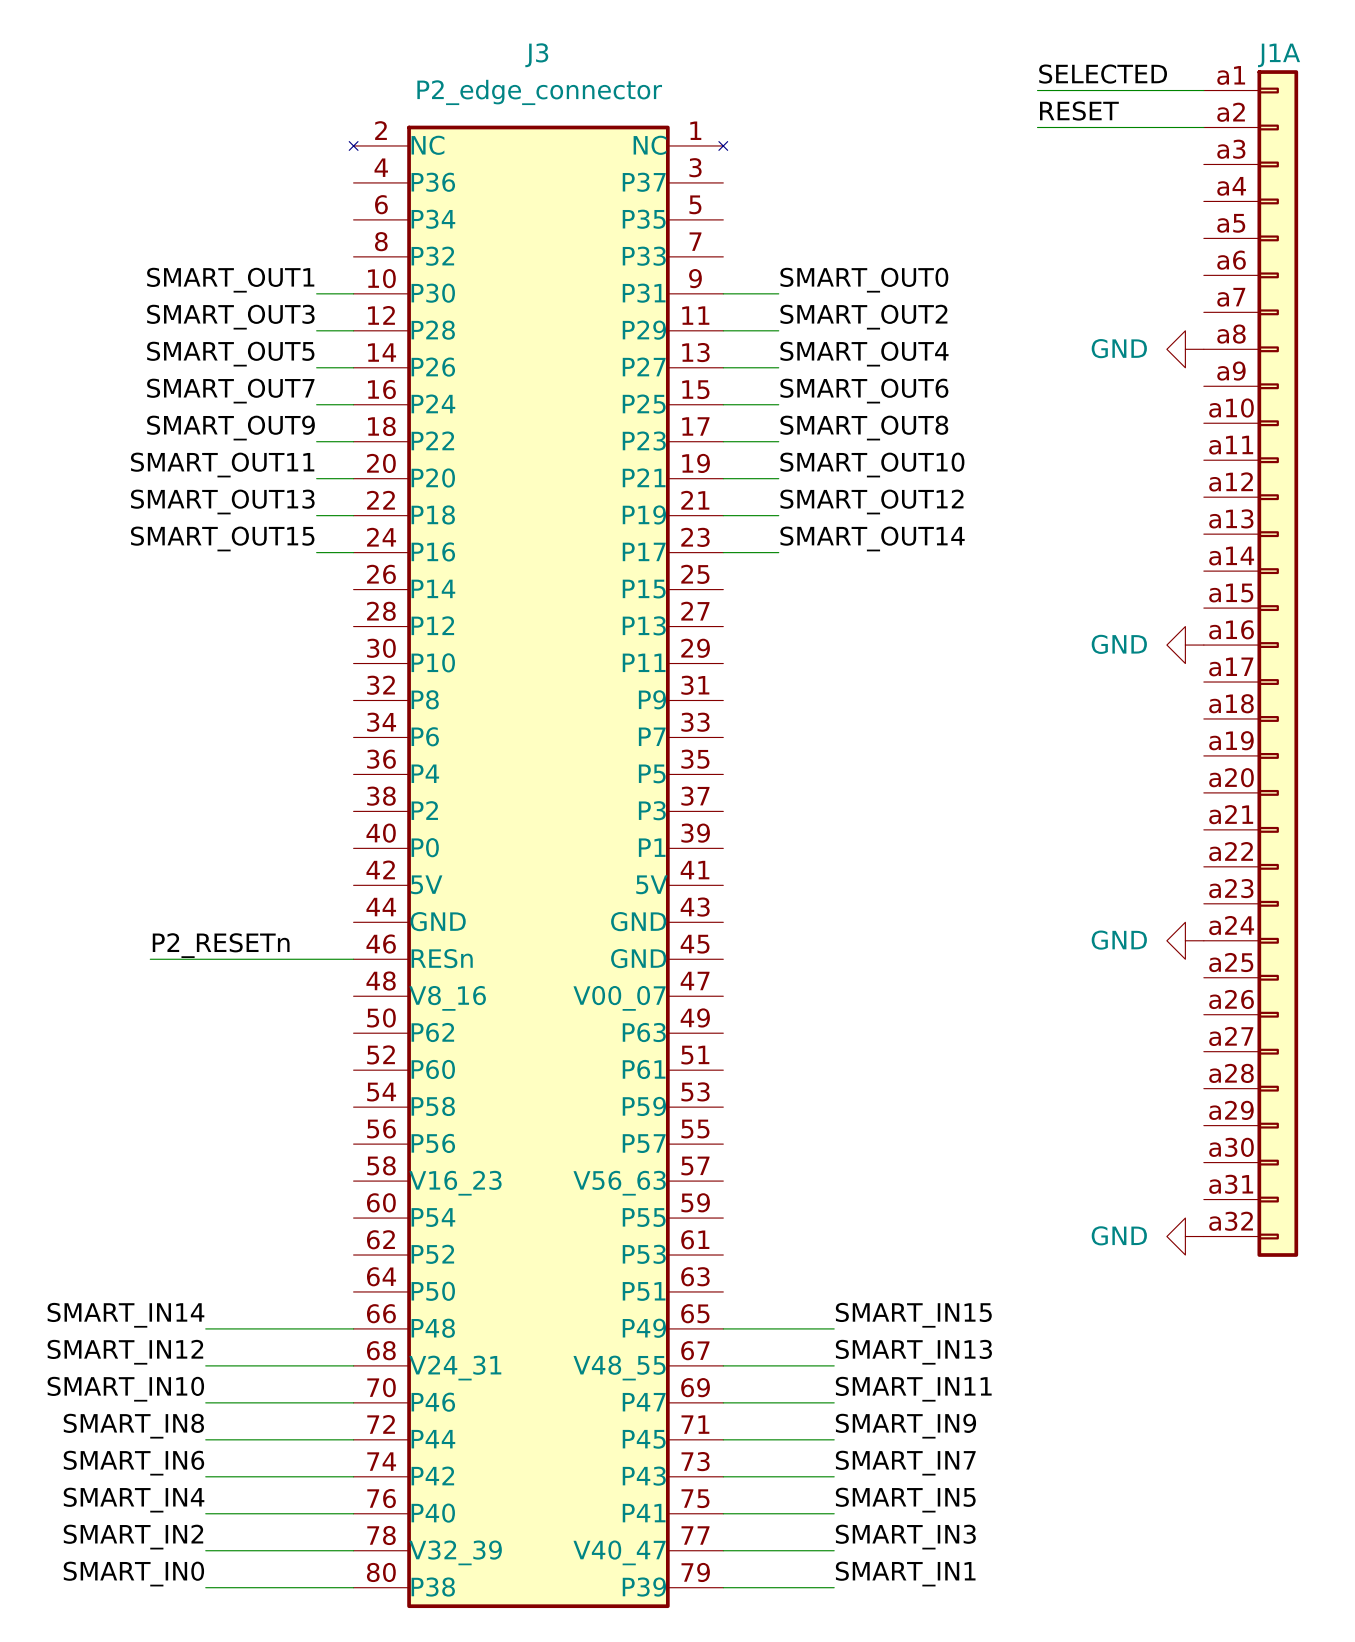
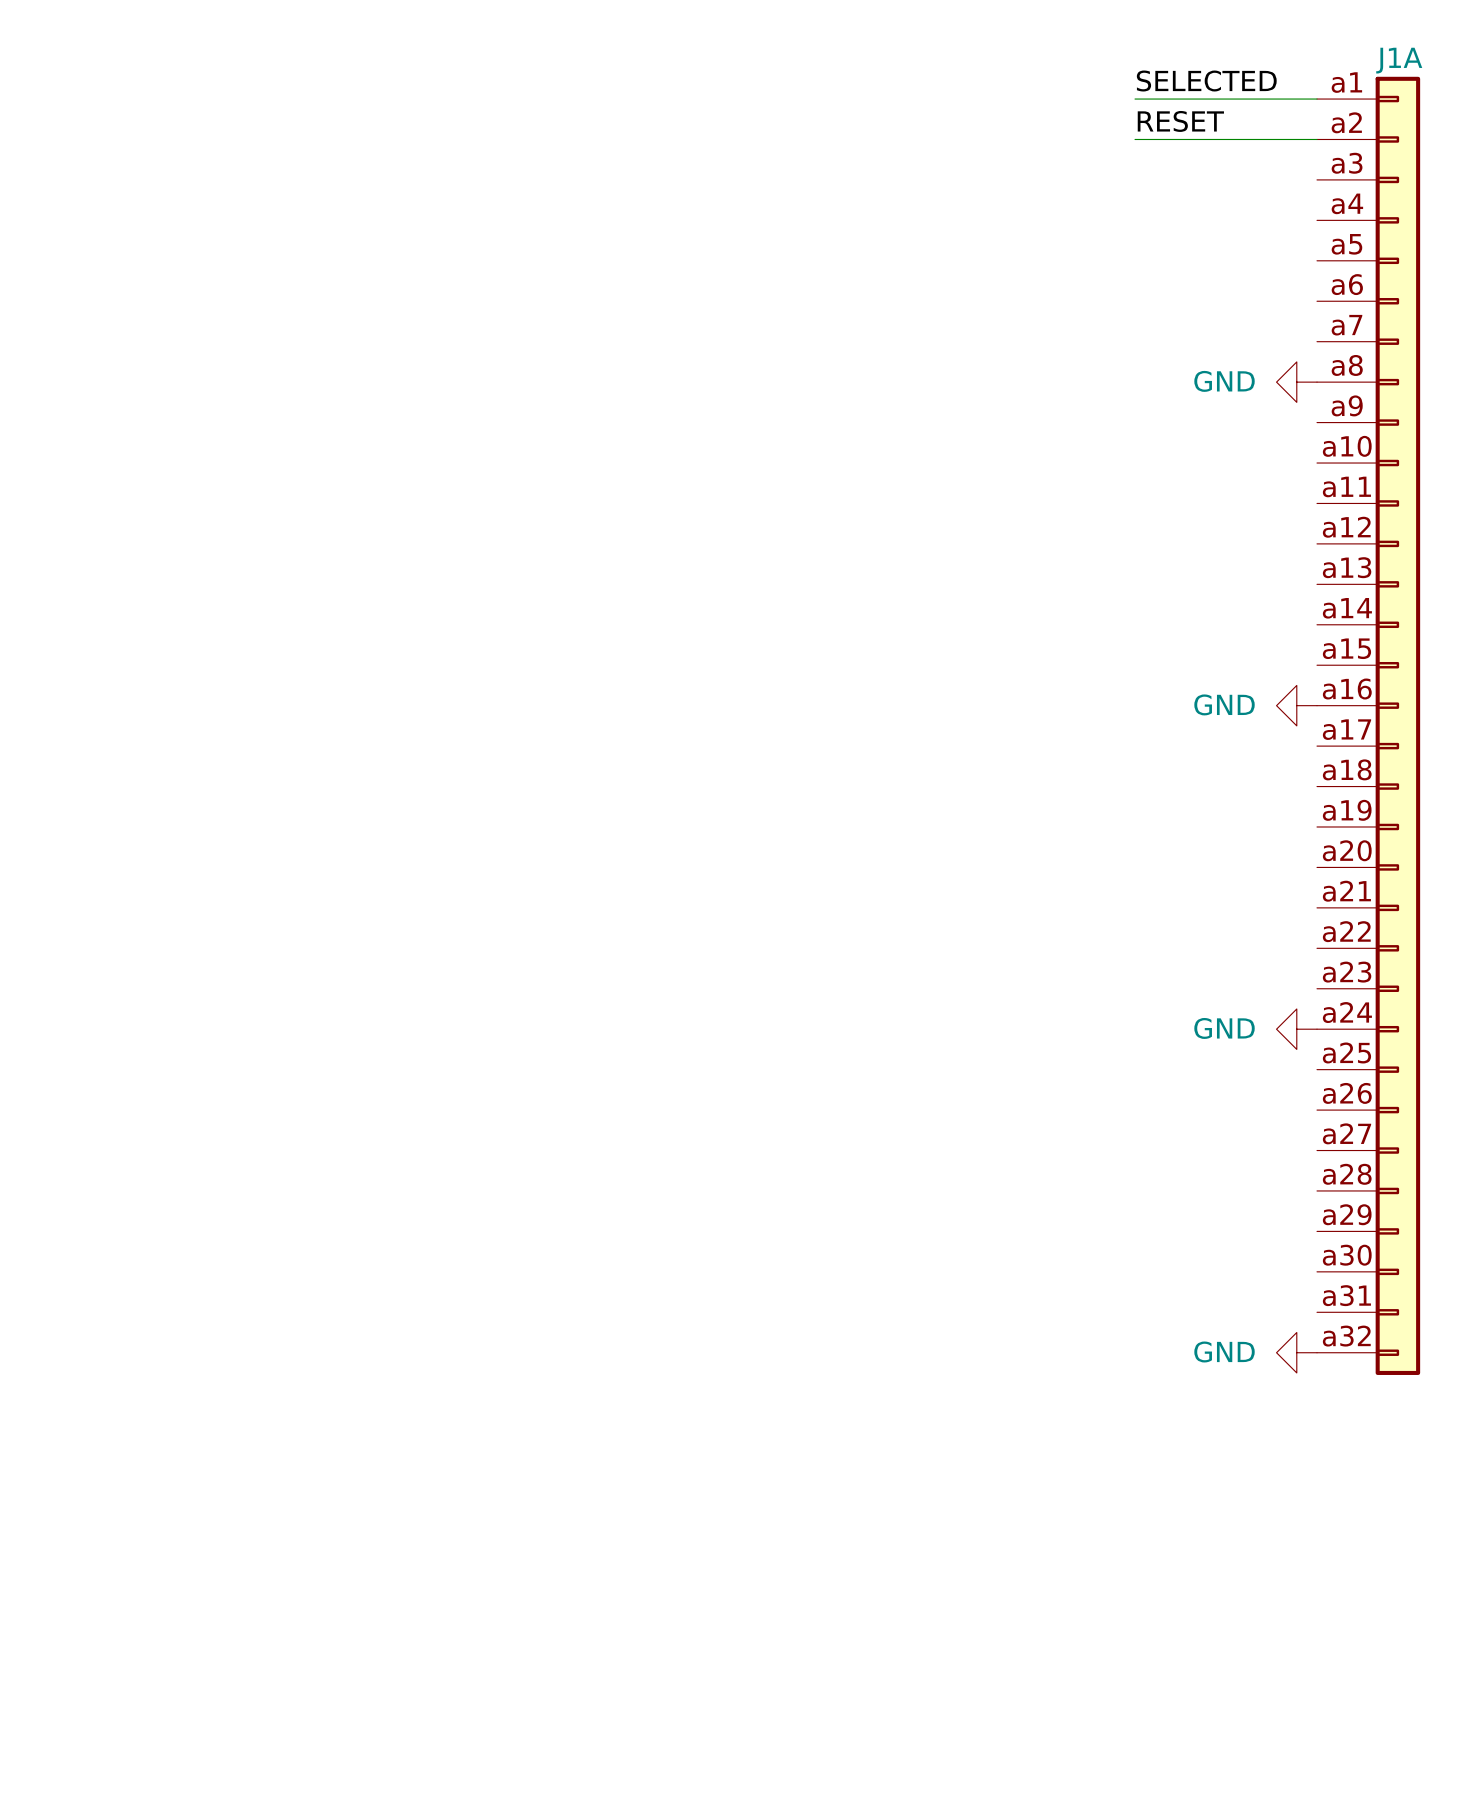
label: SMART_OUT1 (230, 280) -> none
label: SMART_OUT0 (864, 280) -> none
wire: (316, 293) (353, 293) -> none
wire: (723, 293) (778, 293) -> none
label: SMART_OUT3 (230, 317) -> none
label: SMART_OUT2 (863, 317) -> none
wire: (316, 330) (353, 330) -> none
wire: (723, 330) (778, 330) -> none
label: SMART_OUT5 (230, 354) -> none
label: SMART_OUT4 (864, 354) -> none
wire: (316, 367) (353, 367) -> none
wire: (723, 367) (778, 367) -> none
label: SMART_OUT7 (230, 391) -> none
label: SMART_OUT6 (864, 391) -> none
wire: (316, 404) (353, 404) -> none
wire: (723, 404) (778, 404) -> none
label: SMART_OUT9 (230, 428) -> none
label: SMART_OUT8 (864, 428) -> none
wire: (316, 441) (353, 441) -> none
wire: (723, 441) (778, 441) -> none
label: SMART_OUT11 (222, 465) -> none
label: SMART_OUT10 (872, 465) -> none
wire: (316, 478) (353, 478) -> none
wire: (723, 478) (778, 478) -> none
label: SMART_OUT13 (222, 501) -> none
label: SMART_OUT12 (871, 501) -> none
wire: (316, 515) (353, 515) -> none
wire: (723, 515) (778, 515) -> none
label: SMART_OUT15 (222, 538) -> none
label: SMART_OUT14 (872, 538) -> none
wire: (316, 552) (353, 552) -> none
wire: (723, 552) (778, 552) -> none
J3: P2_edge_connector (538, 866) -> none
label: P2_RESETn (221, 945) -> none
wire: (150, 959) (353, 959) -> none
label: SMART_IN14 (125, 1315) -> none
label: SMART_IN15 (913, 1315) -> none
wire: (205, 1328) (353, 1328) -> none
wire: (723, 1328) (834, 1328) -> none
label: SMART_IN12 (125, 1352) -> none
label: SMART_IN13 (913, 1352) -> none
wire: (205, 1365) (353, 1365) -> none
wire: (723, 1365) (834, 1365) -> none
label: SMART_IN10 (125, 1389) -> none
label: SMART_IN11 (913, 1389) -> none
wire: (205, 1402) (353, 1402) -> none
wire: (723, 1402) (834, 1402) -> none
label: SMART_IN8 (133, 1426) -> none
label: SMART_IN9 (905, 1426) -> none
wire: (205, 1439) (353, 1439) -> none
wire: (723, 1439) (834, 1439) -> none
label: SMART_IN6 (133, 1463) -> none
label: SMART_IN7 (905, 1463) -> none
wire: (205, 1476) (353, 1476) -> none
wire: (723, 1476) (834, 1476) -> none
label: SMART_IN4 (134, 1500) -> none
label: SMART_IN5 (905, 1500) -> none
wire: (205, 1513) (353, 1513) -> none
wire: (723, 1513) (834, 1513) -> none
label: SMART_IN2 (133, 1537) -> none
label: SMART_IN3 (905, 1537) -> none
wire: (205, 1550) (353, 1550) -> none
wire: (723, 1550) (834, 1550) -> none
label: SMART_IN0 (133, 1574) -> none
label: SMART_IN1 (905, 1574) -> none
wire: (205, 1587) (353, 1587) -> none
wire: (723, 1587) (834, 1587) -> none

